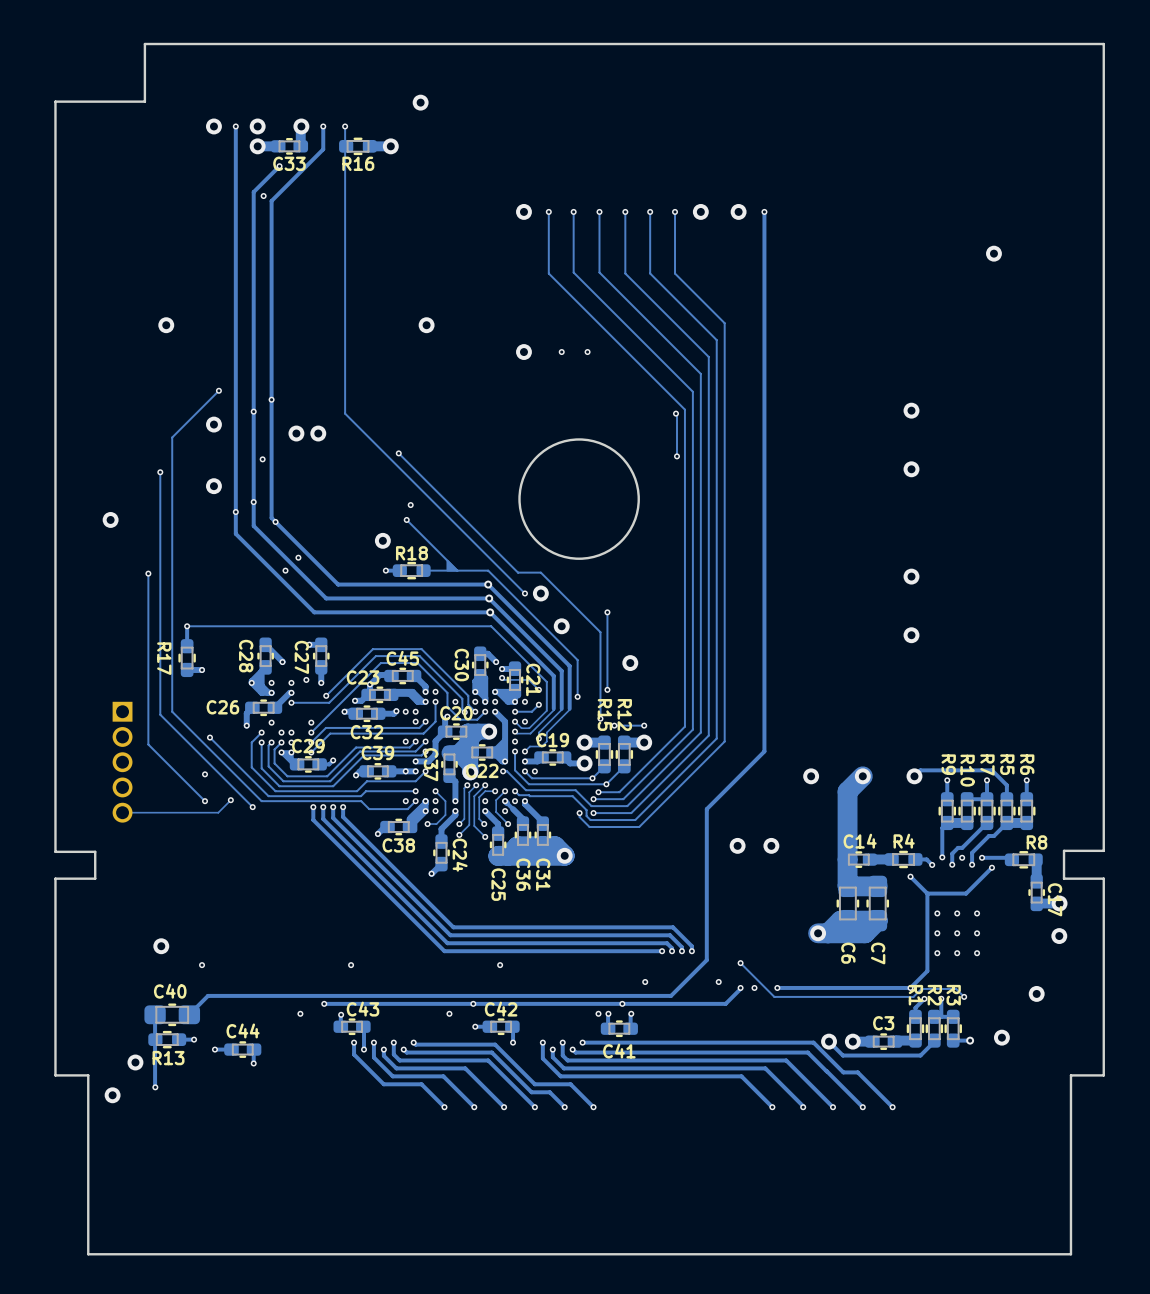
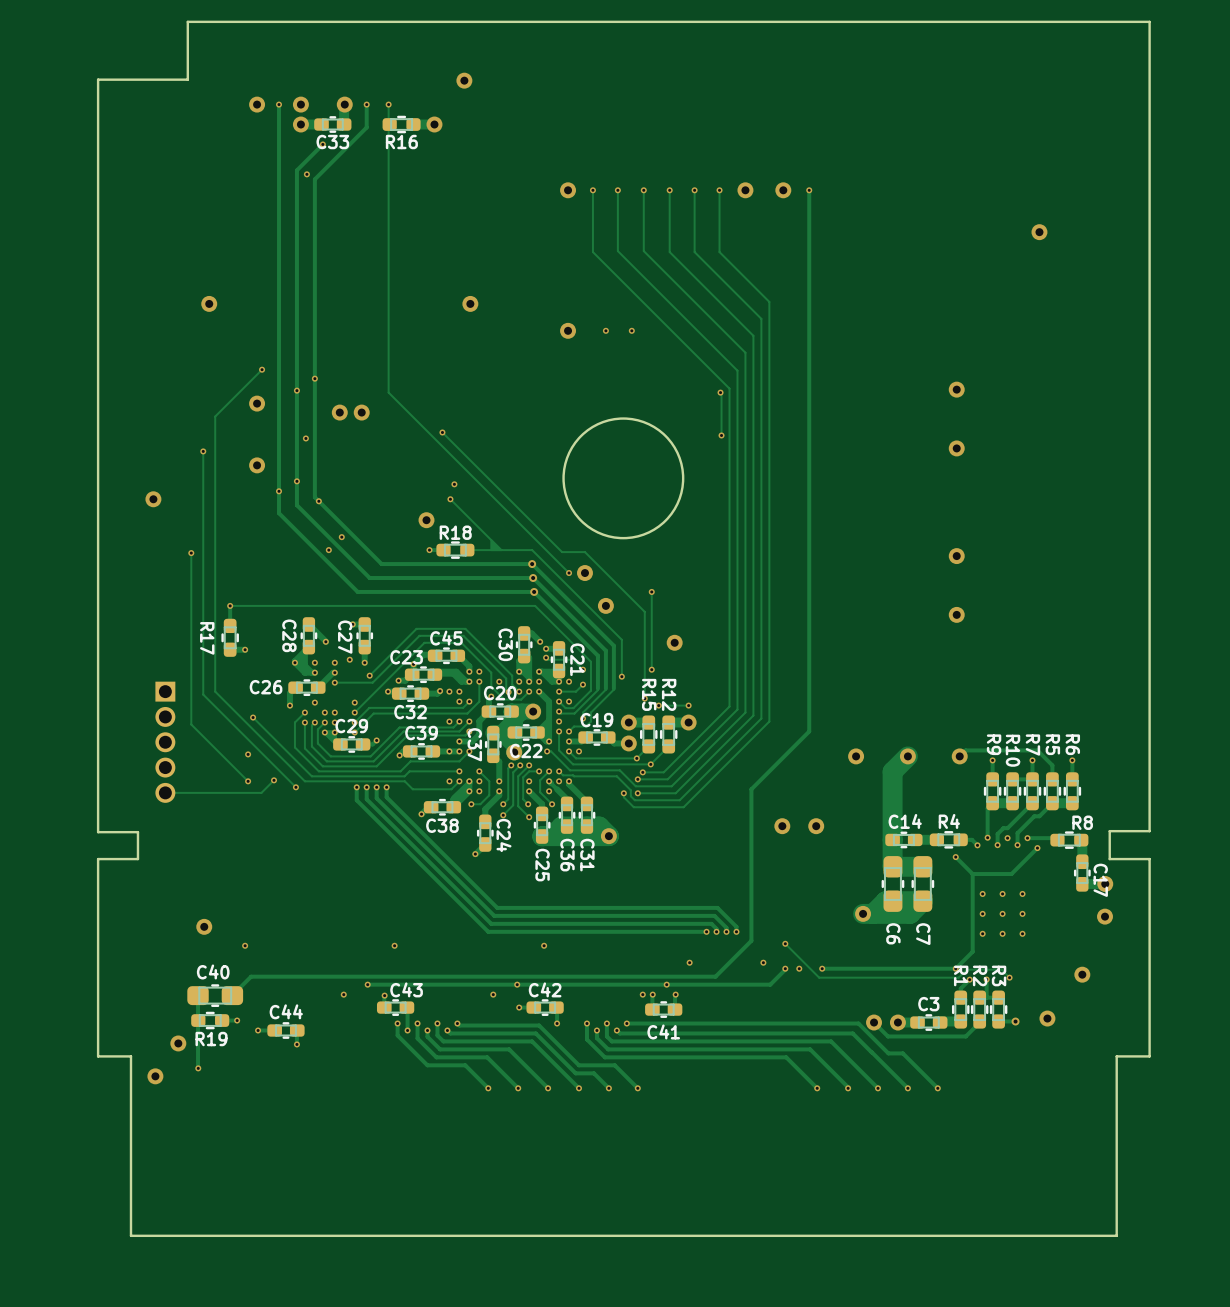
R13 name: R13 (168, 1058) -> R19 (211, 1039)

